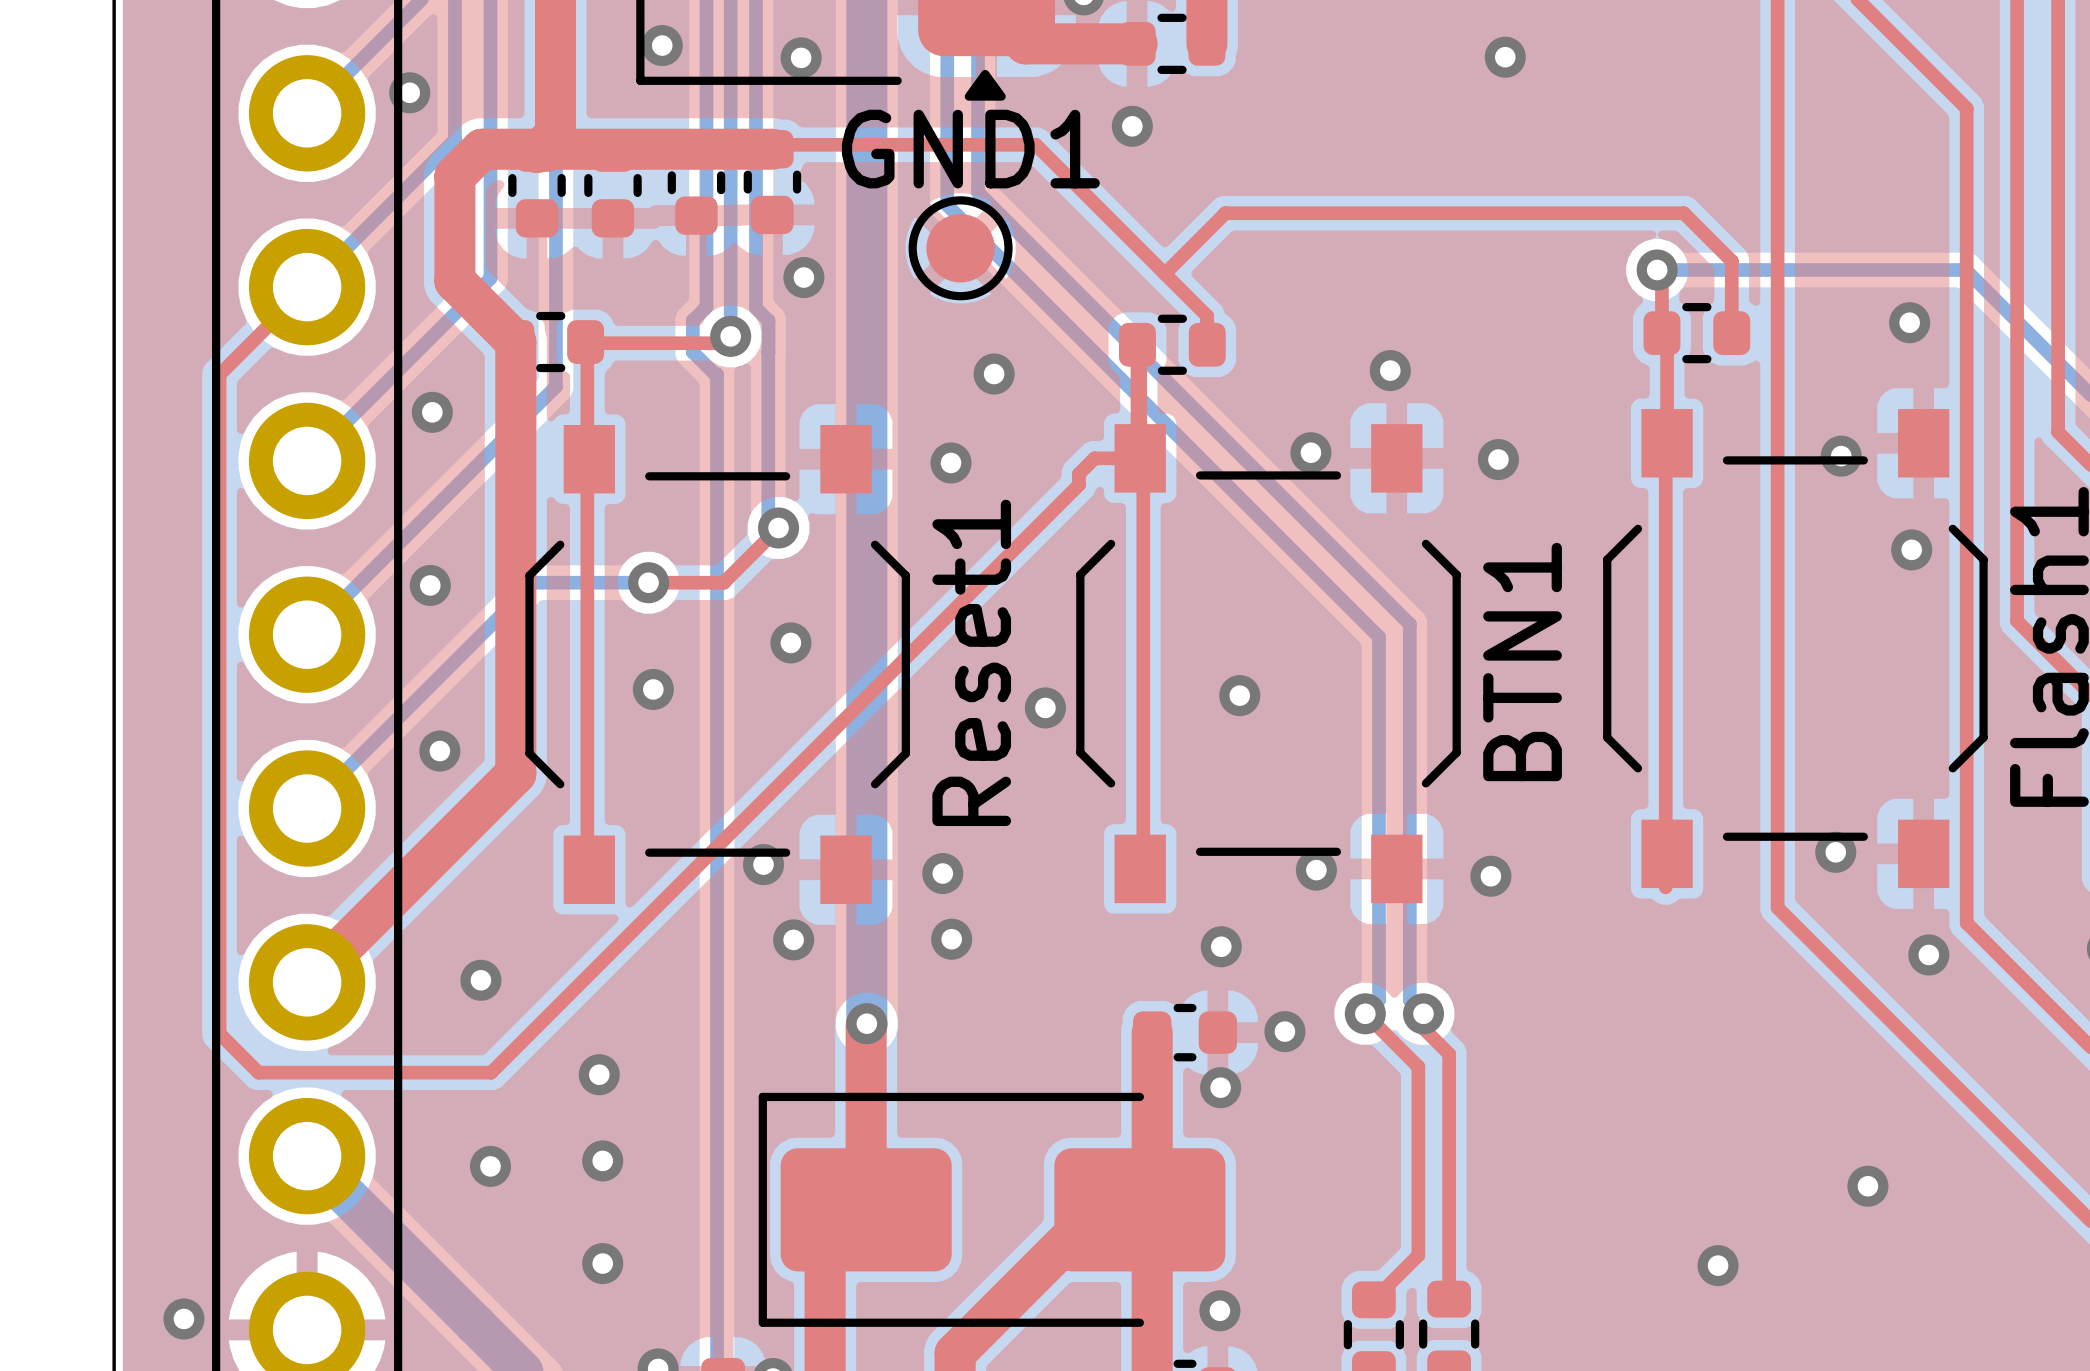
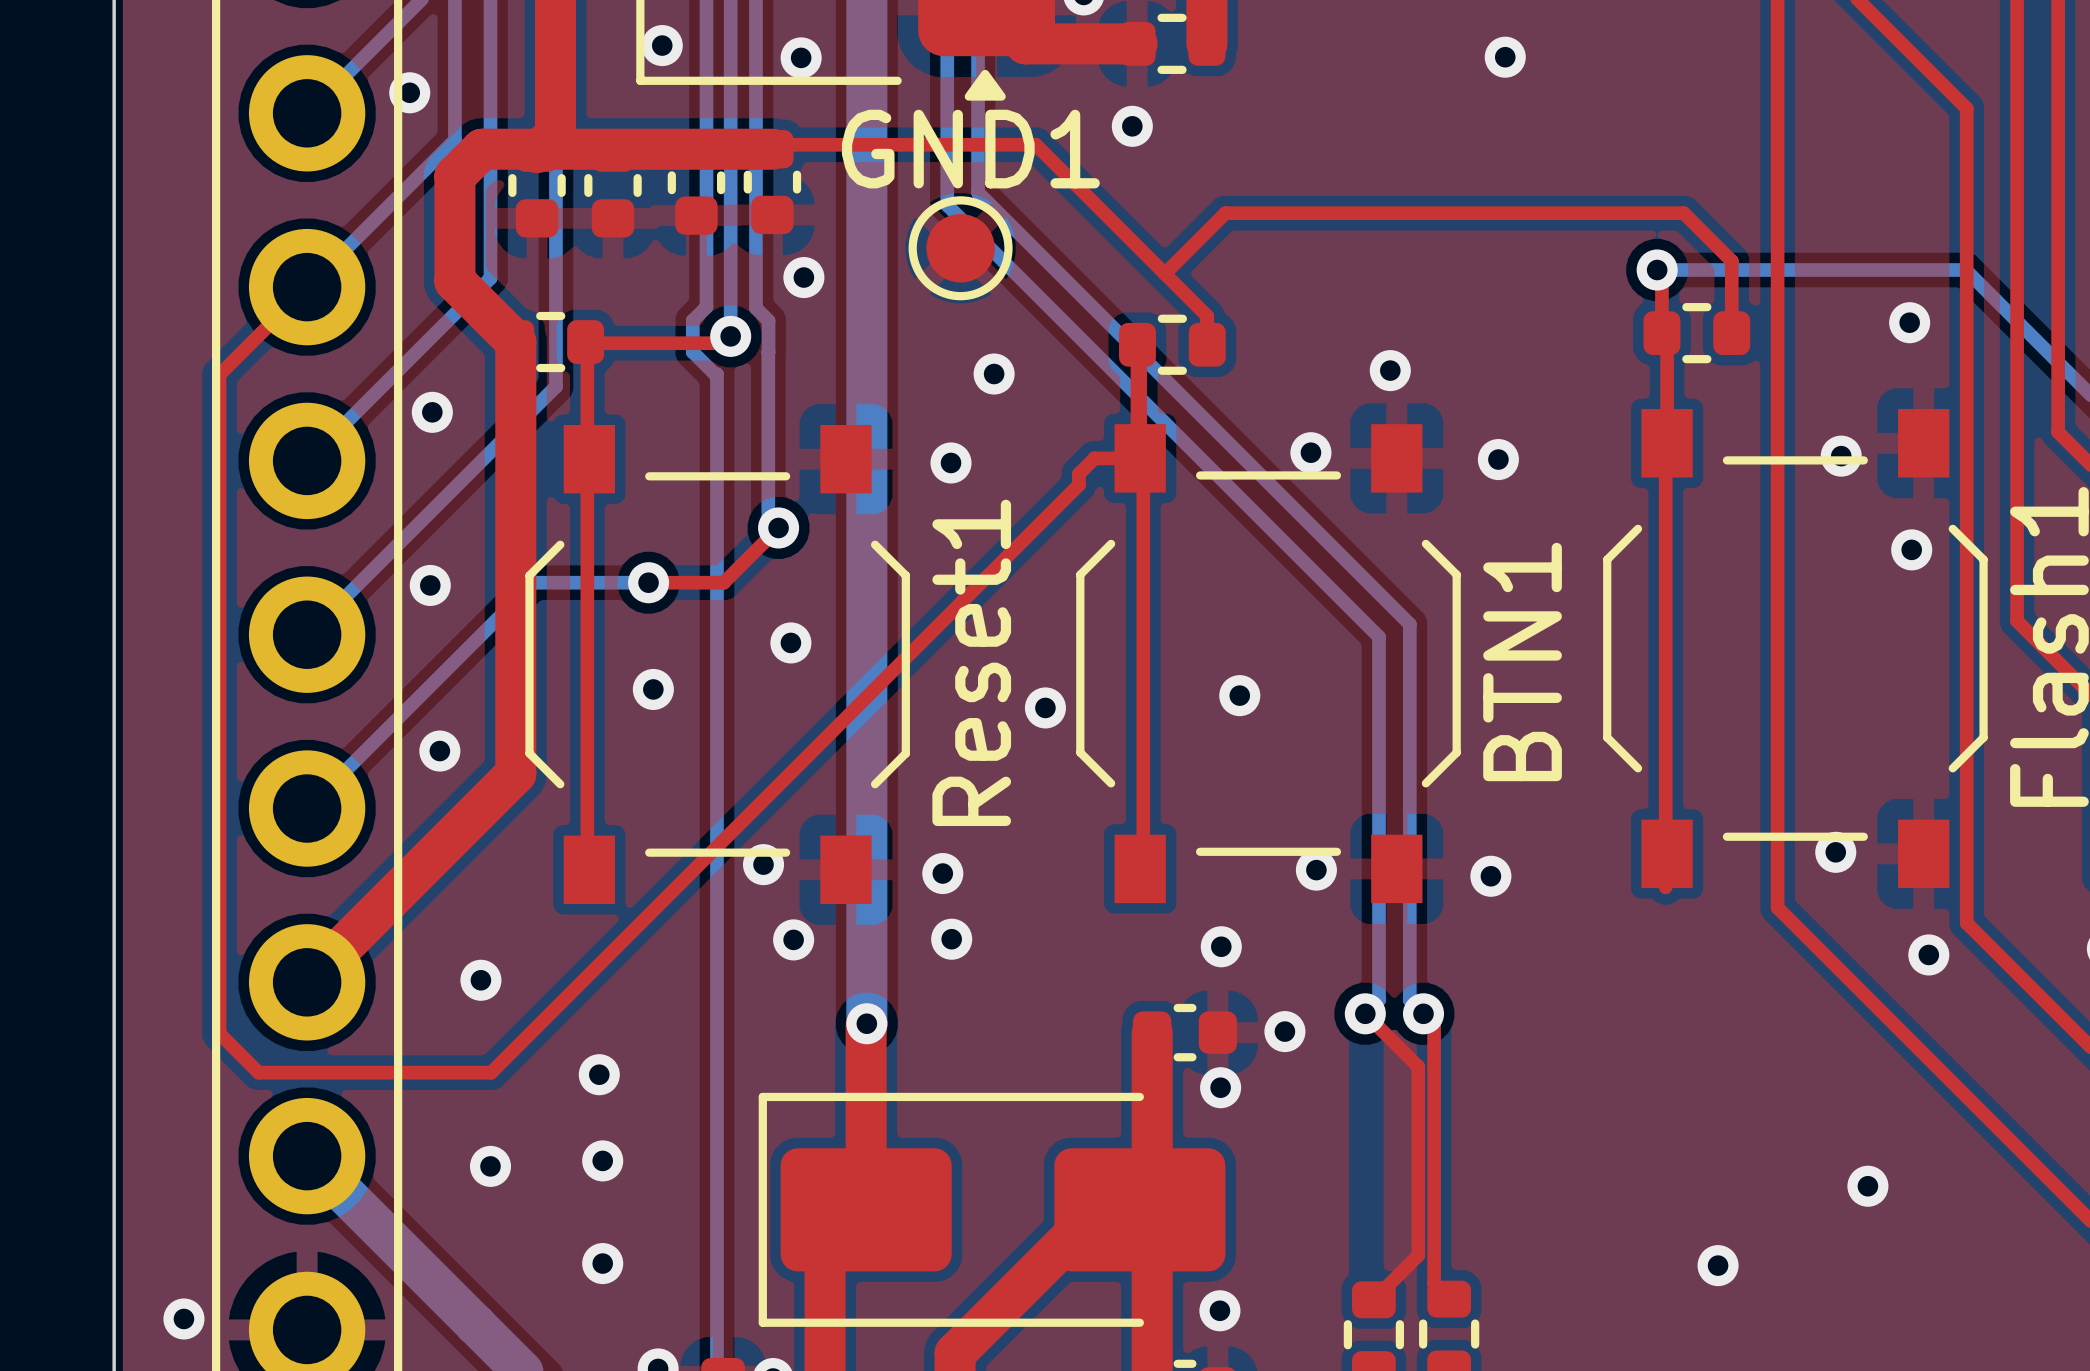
top track: (1423, 1013) (1423, 1028) (1449, 1054) (1449, 1299) -> (1423, 1013) (1434, 1024) (1434, 1284) (1449, 1299)

